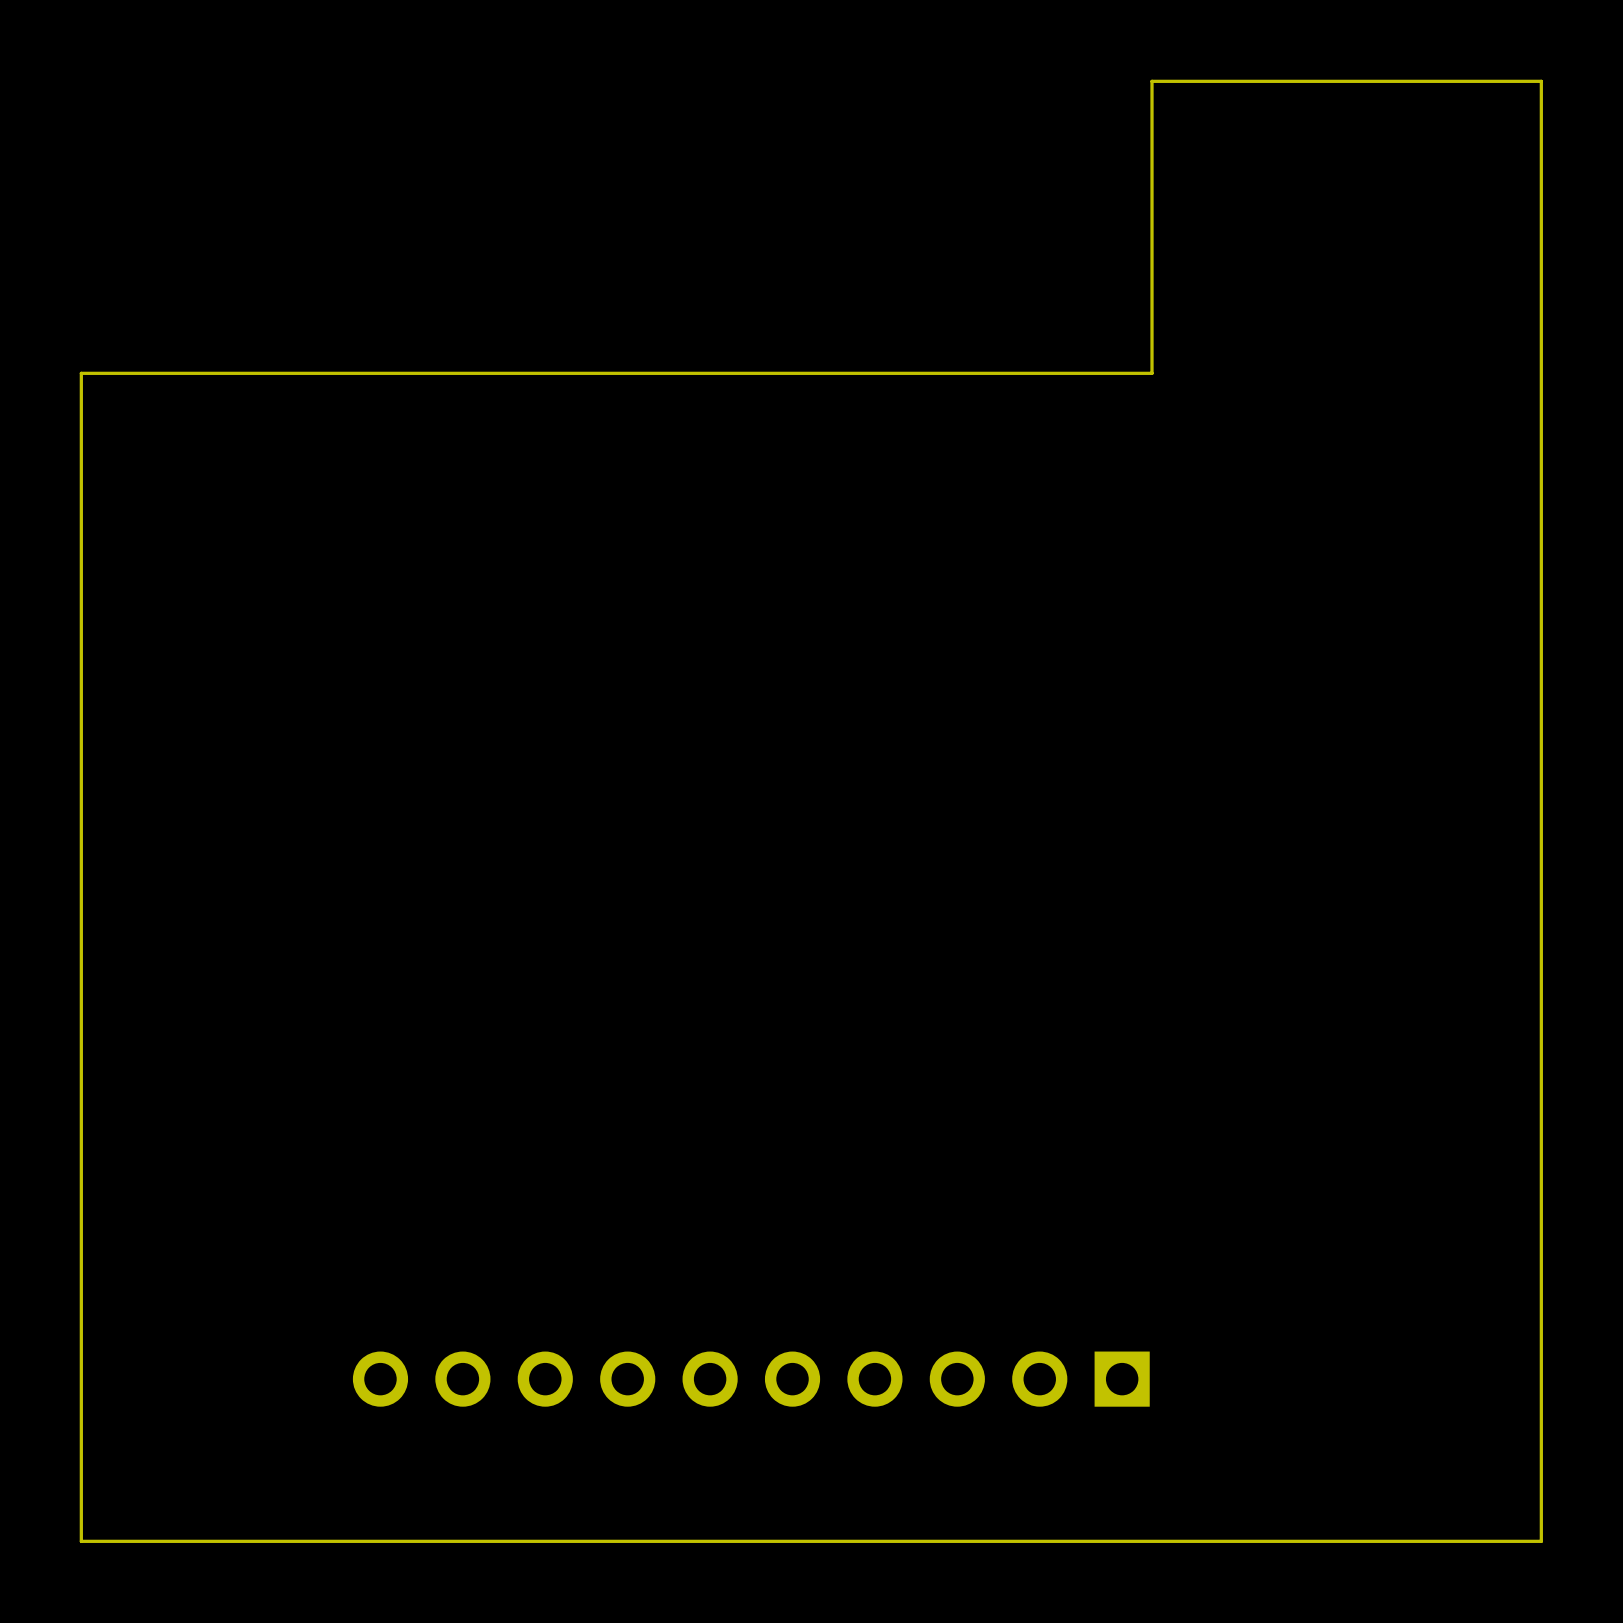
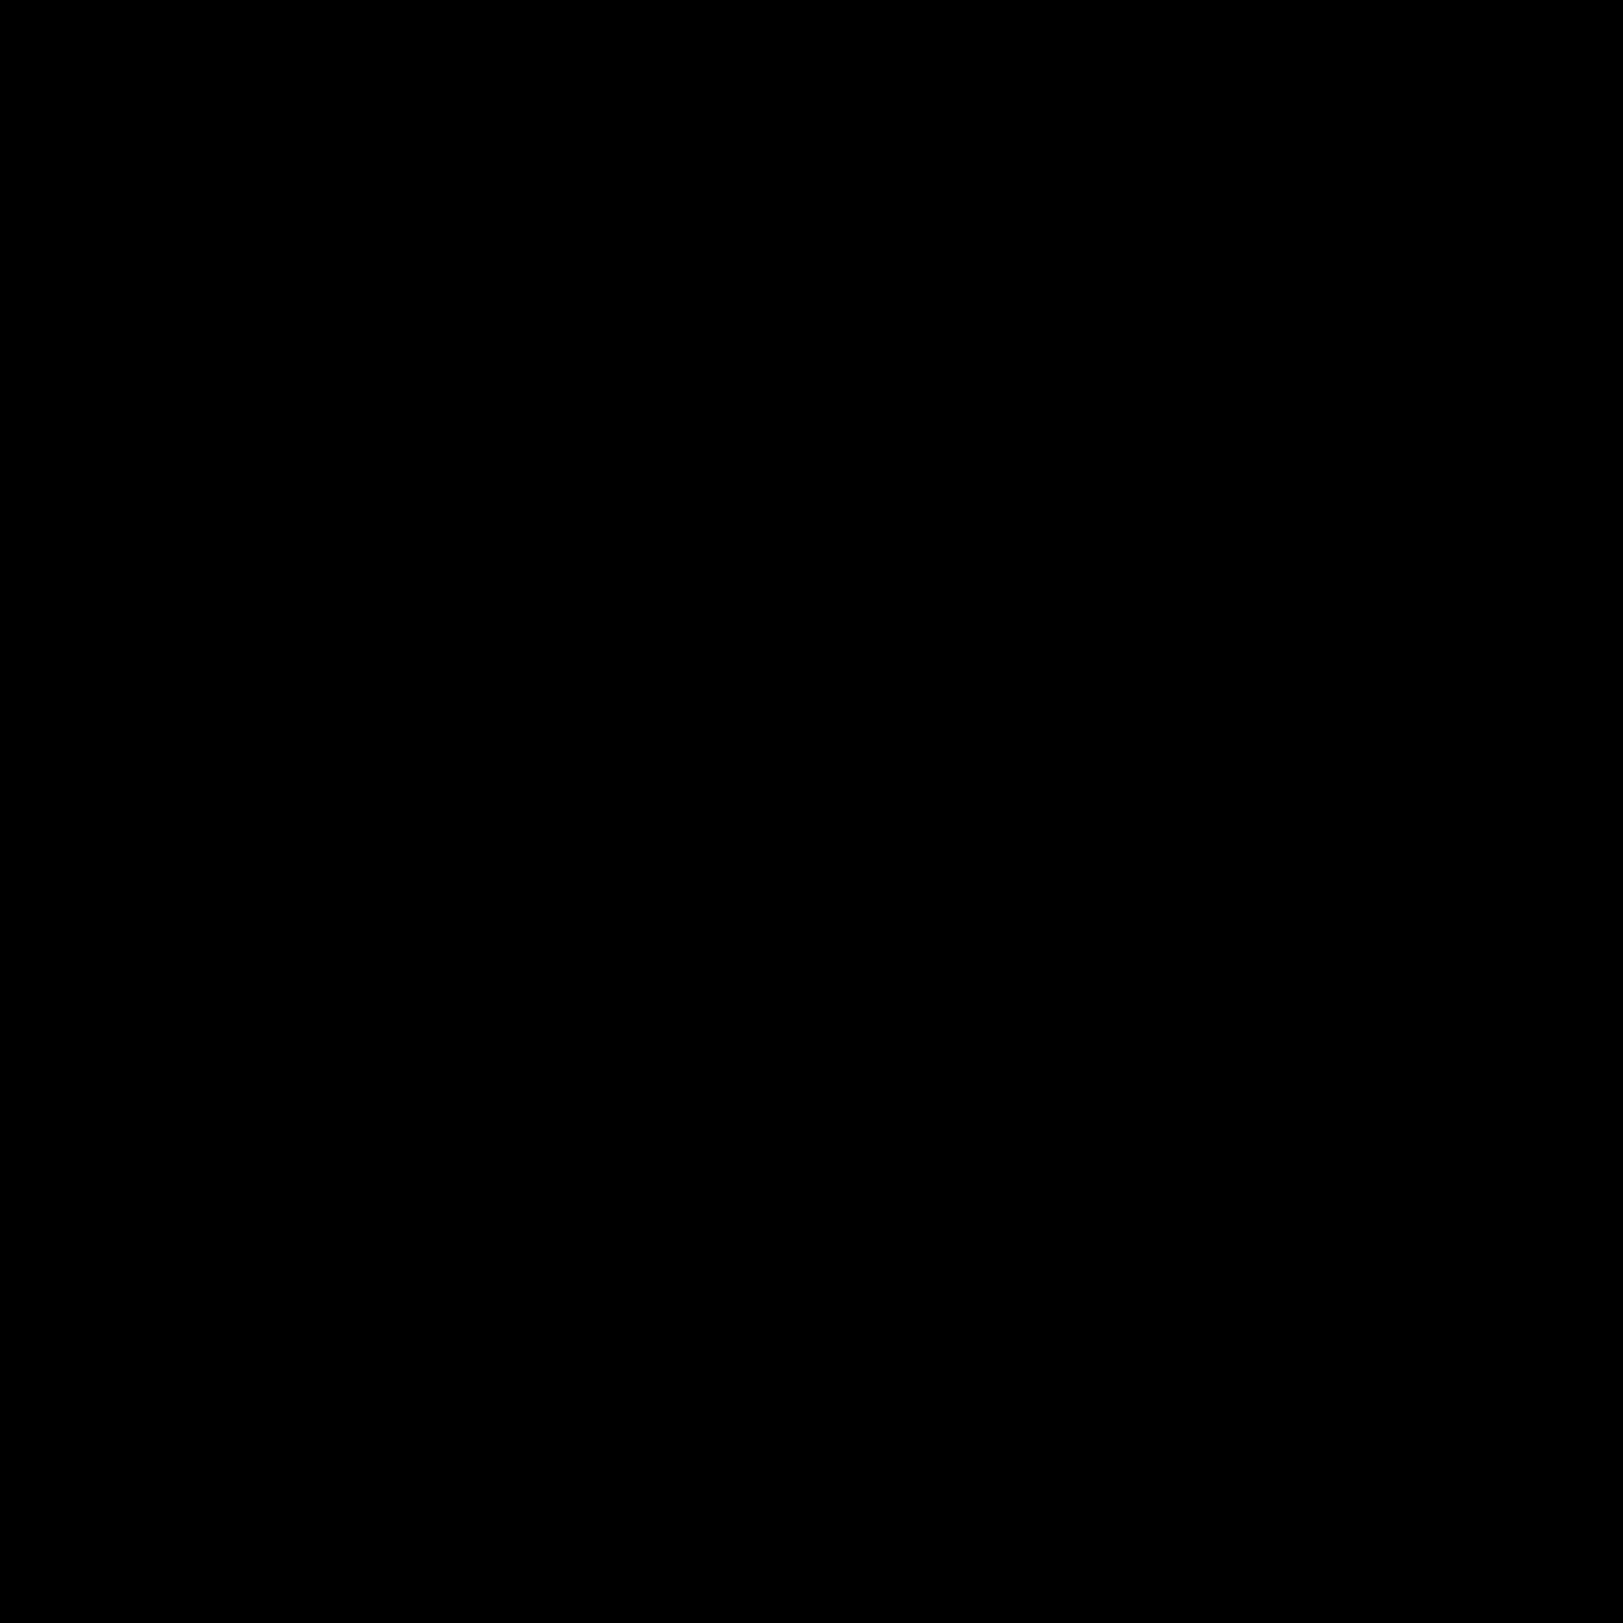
board edge: (1541, 81) (1541, 1541) (81, 1541) (81, 373) (1152, 373) (1152, 81) (1541, 81) -> none
part: (751, 1379) -> none

